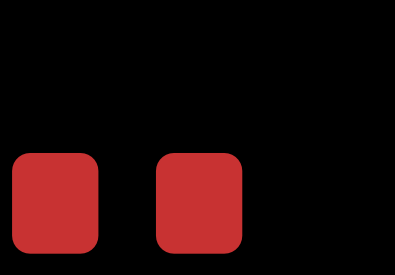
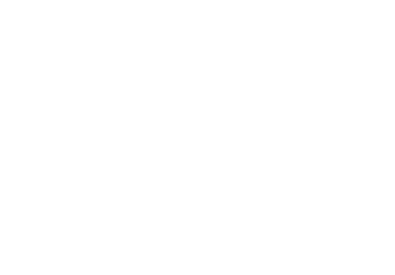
part: (127, 203) -> none

